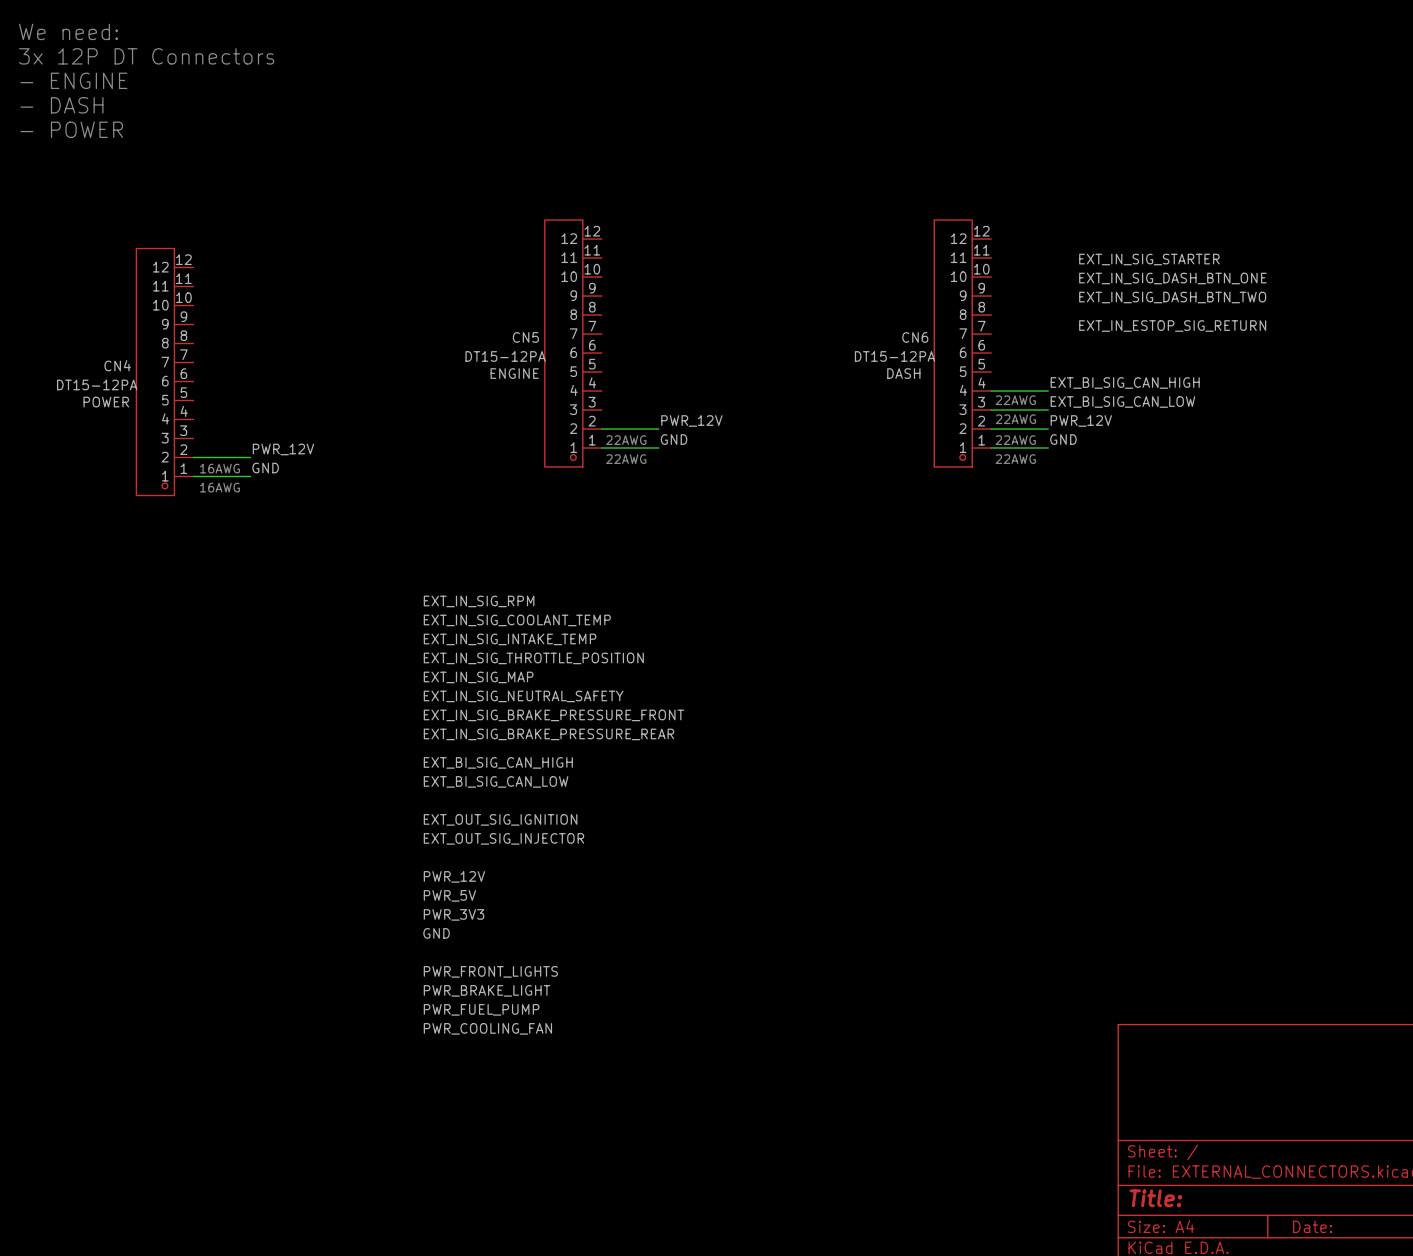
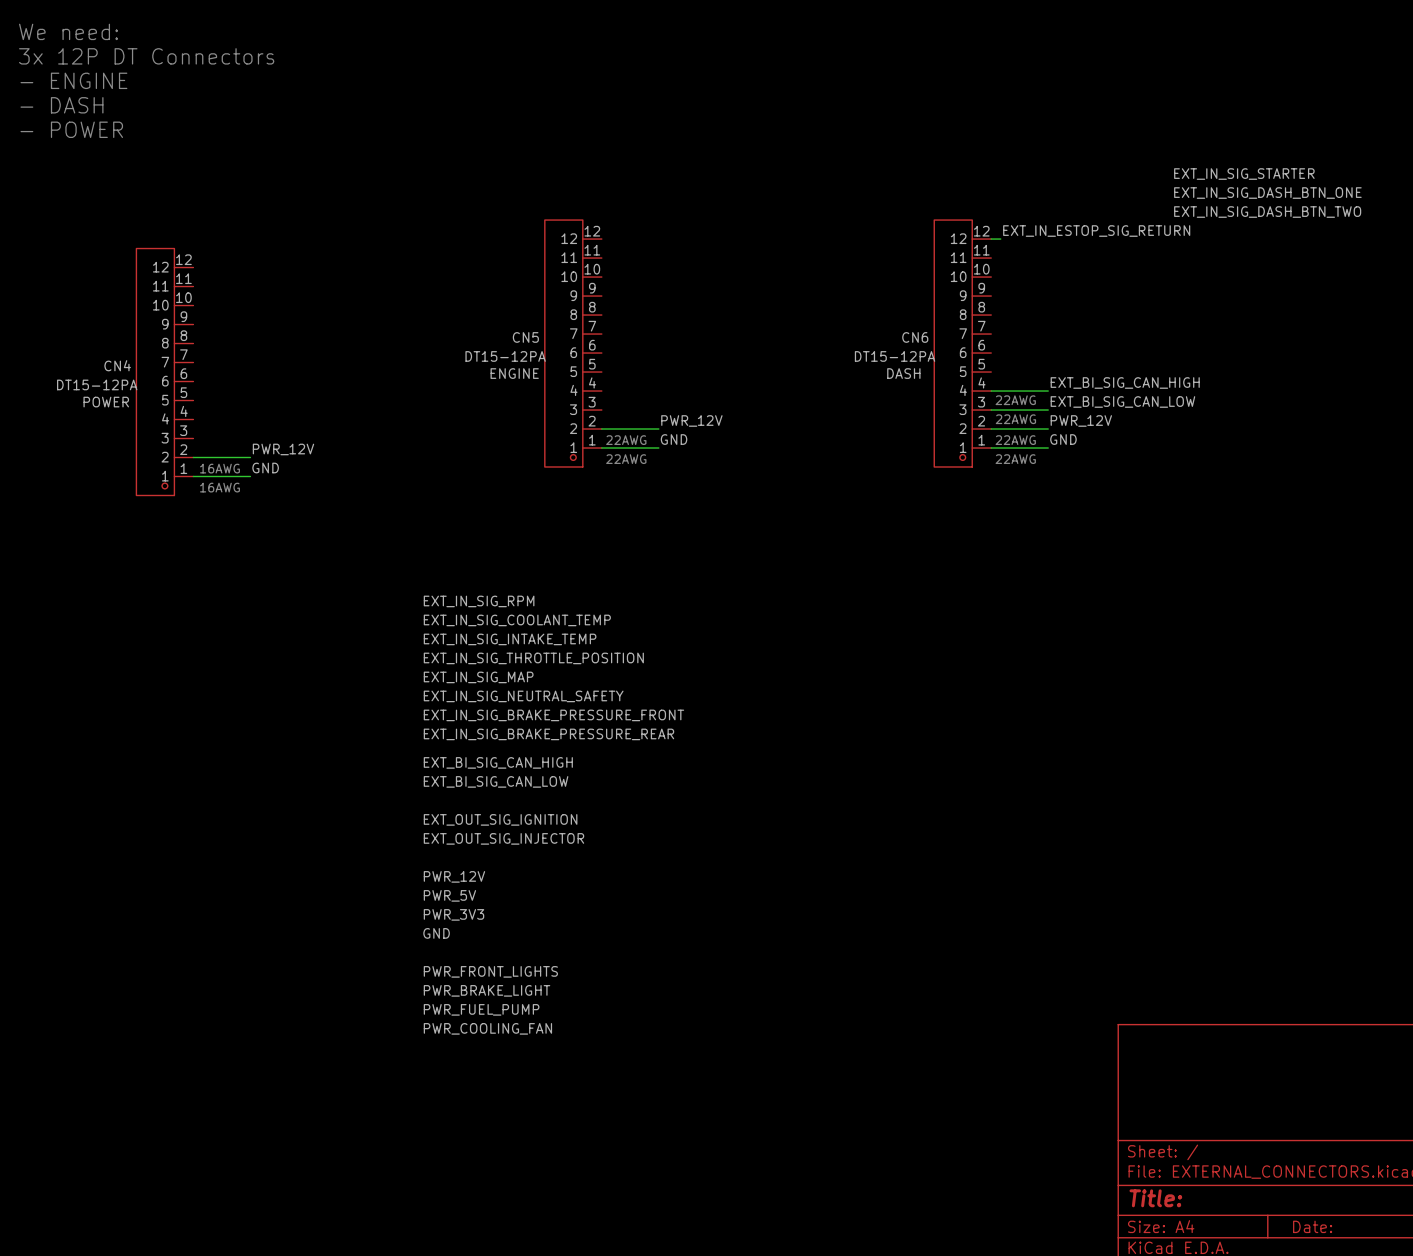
wire: none -> (991, 239) (1000, 239)
label position: EXT_IN_SIG_STARTER (1149, 259) -> EXT_IN_SIG_STARTER (1244, 174)
label position: EXT_IN_SIG_DASH_BTN_ONE (1172, 278) -> EXT_IN_SIG_DASH_BTN_ONE (1267, 193)
label position: EXT_IN_SIG_DASH_BTN_TWO (1172, 297) -> EXT_IN_SIG_DASH_BTN_TWO (1267, 212)
label position: EXT_IN_ESTOP_SIG_RETURN (1172, 326) -> EXT_IN_ESTOP_SIG_RETURN (1096, 231)

